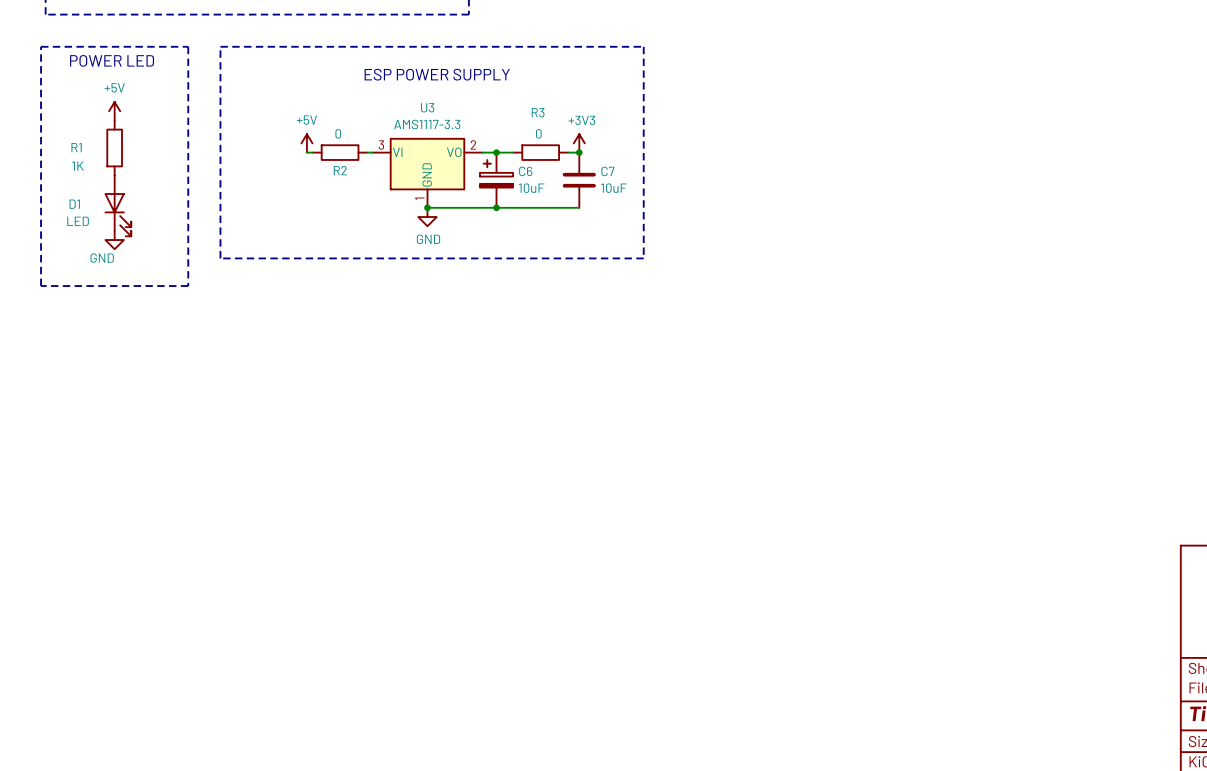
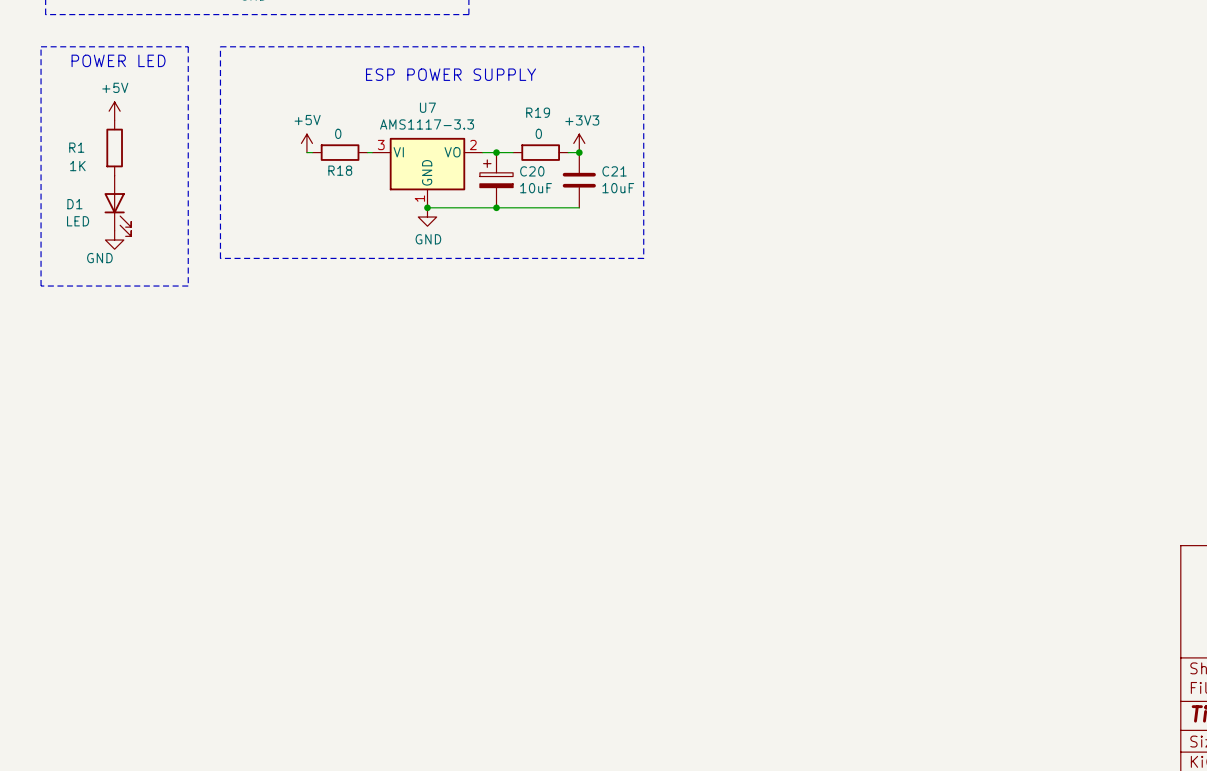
U3 name: U3 (427, 107) -> U7 (427, 107)
R3 name: R3 (538, 112) -> R19 (538, 112)
R2 name: R2 (340, 170) -> R18 (340, 170)
C6 name: C6 (525, 171) -> C20 (532, 171)
C7 name: C7 (607, 171) -> C21 (614, 171)

